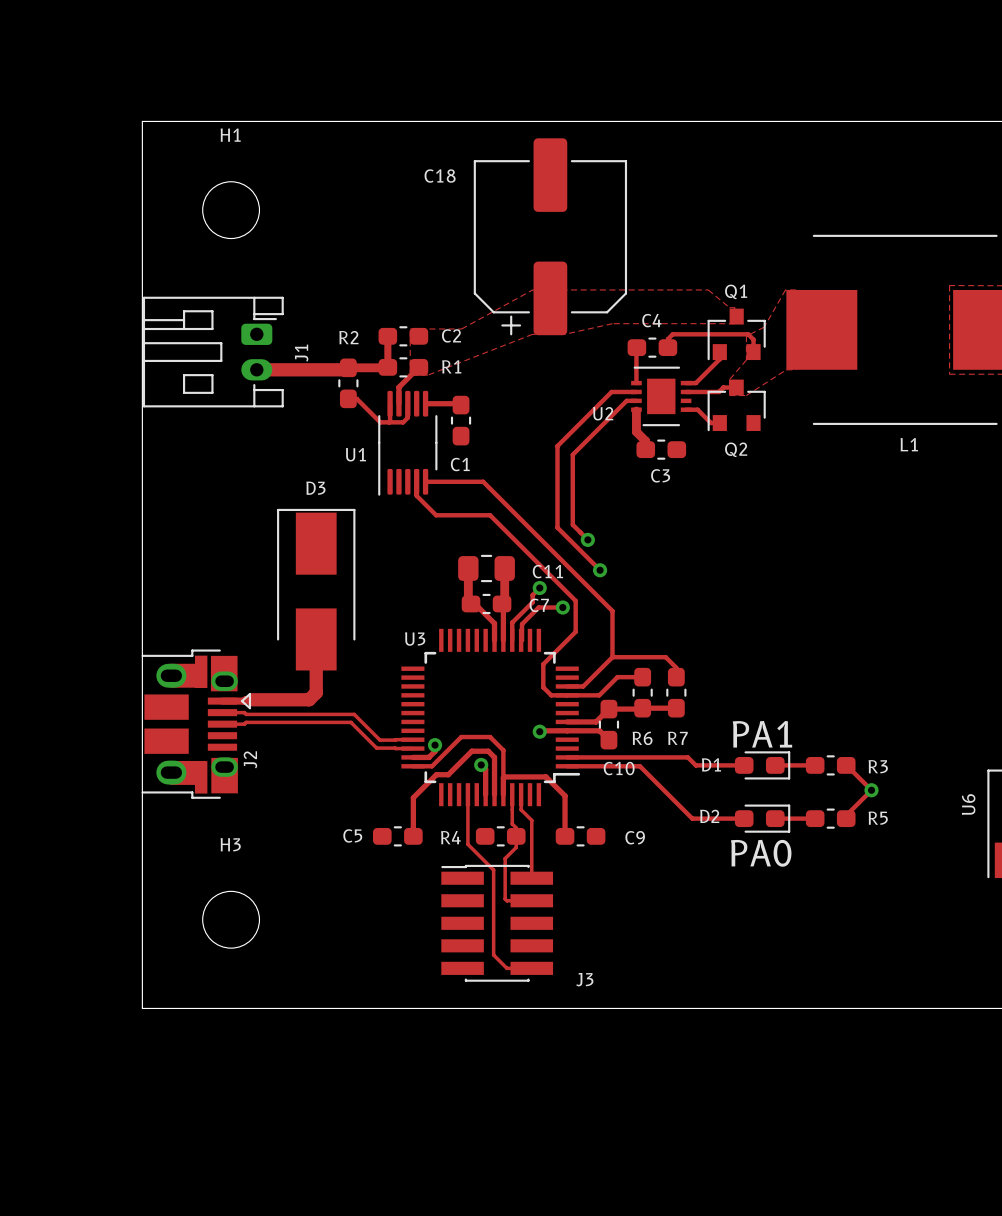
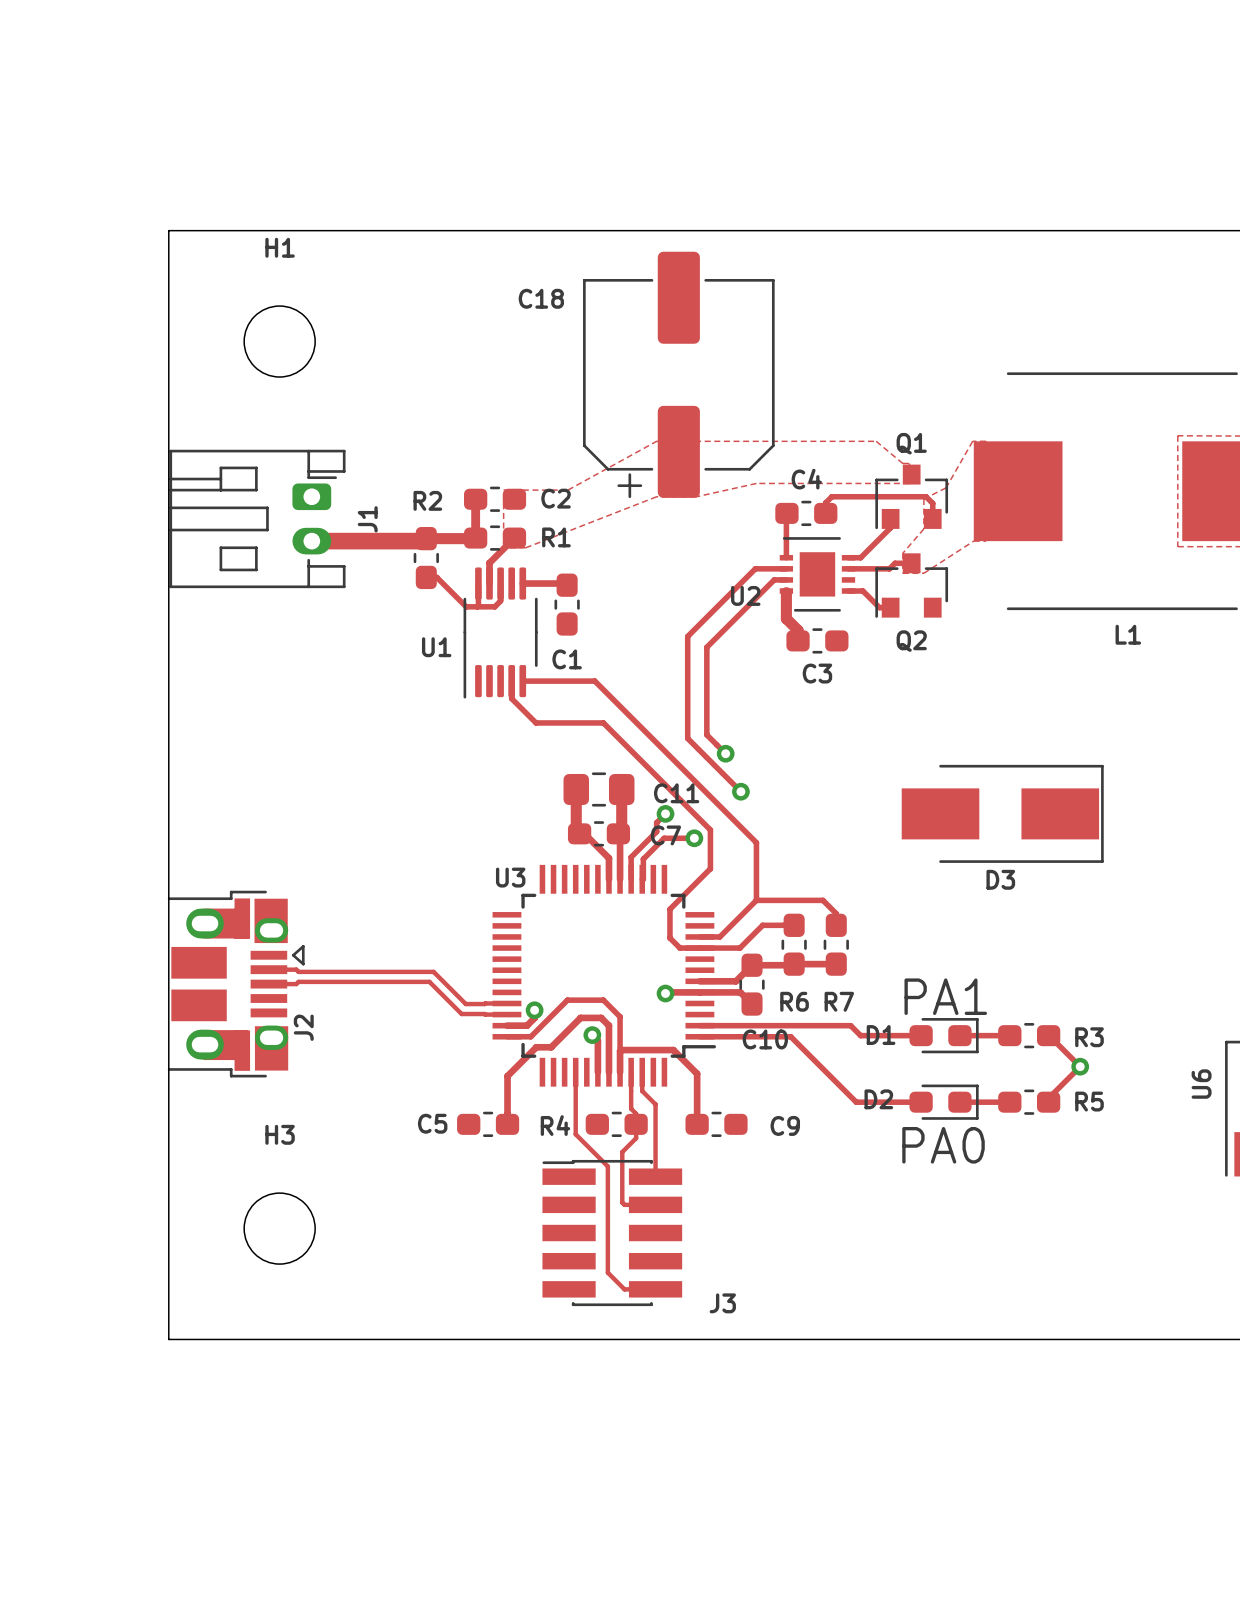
D3 name position: D3 (315, 488) -> D3 (1000, 879)
D3 rotation: 0° (316, 589) -> 90° clockwise (1002, 813)
D3 position: (316, 589) -> (1002, 813)
track: (316, 639) (316, 692) (309, 699) (222, 701) -> none

